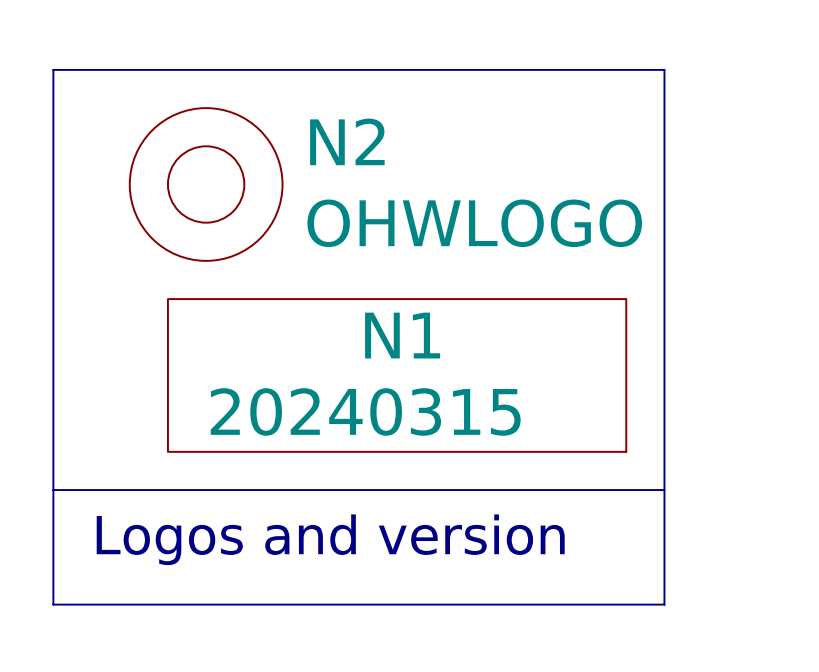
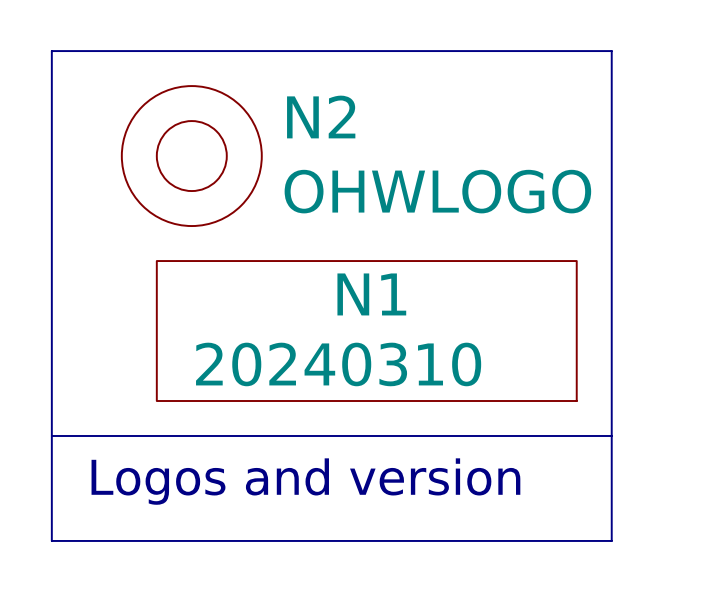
N1 value: 20240315 (365, 411) -> 20240310 (338, 364)

